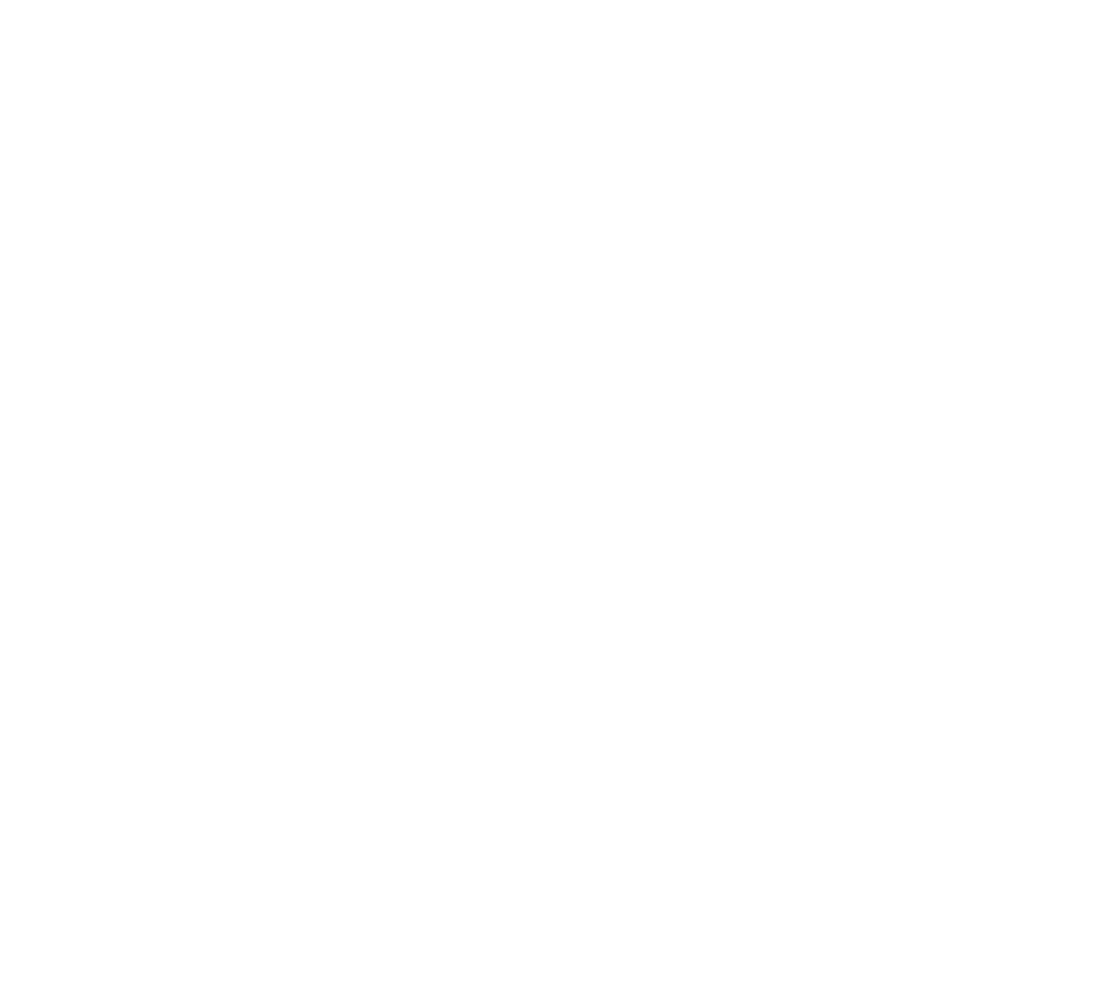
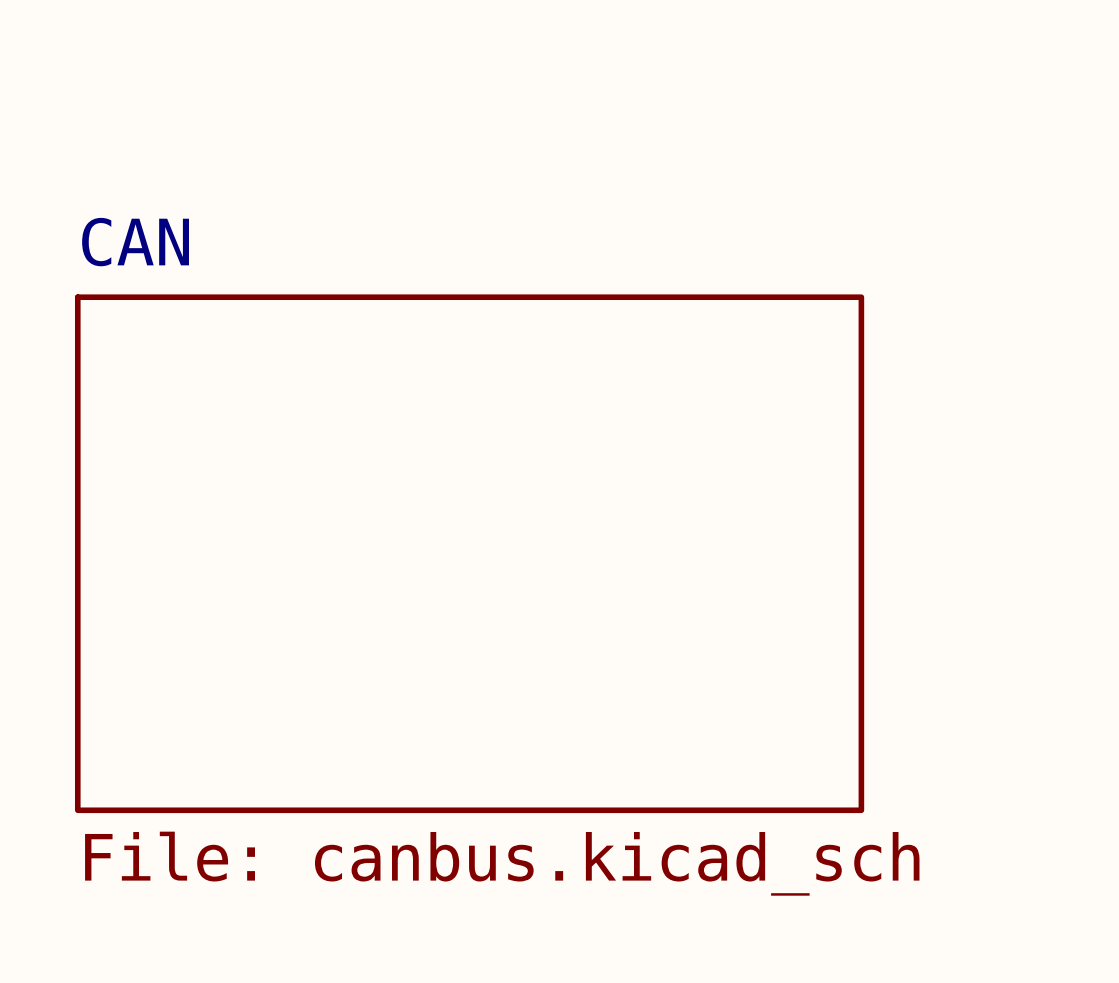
sheet CAN: none -> File: canbus.kicad_sch (469, 553)

